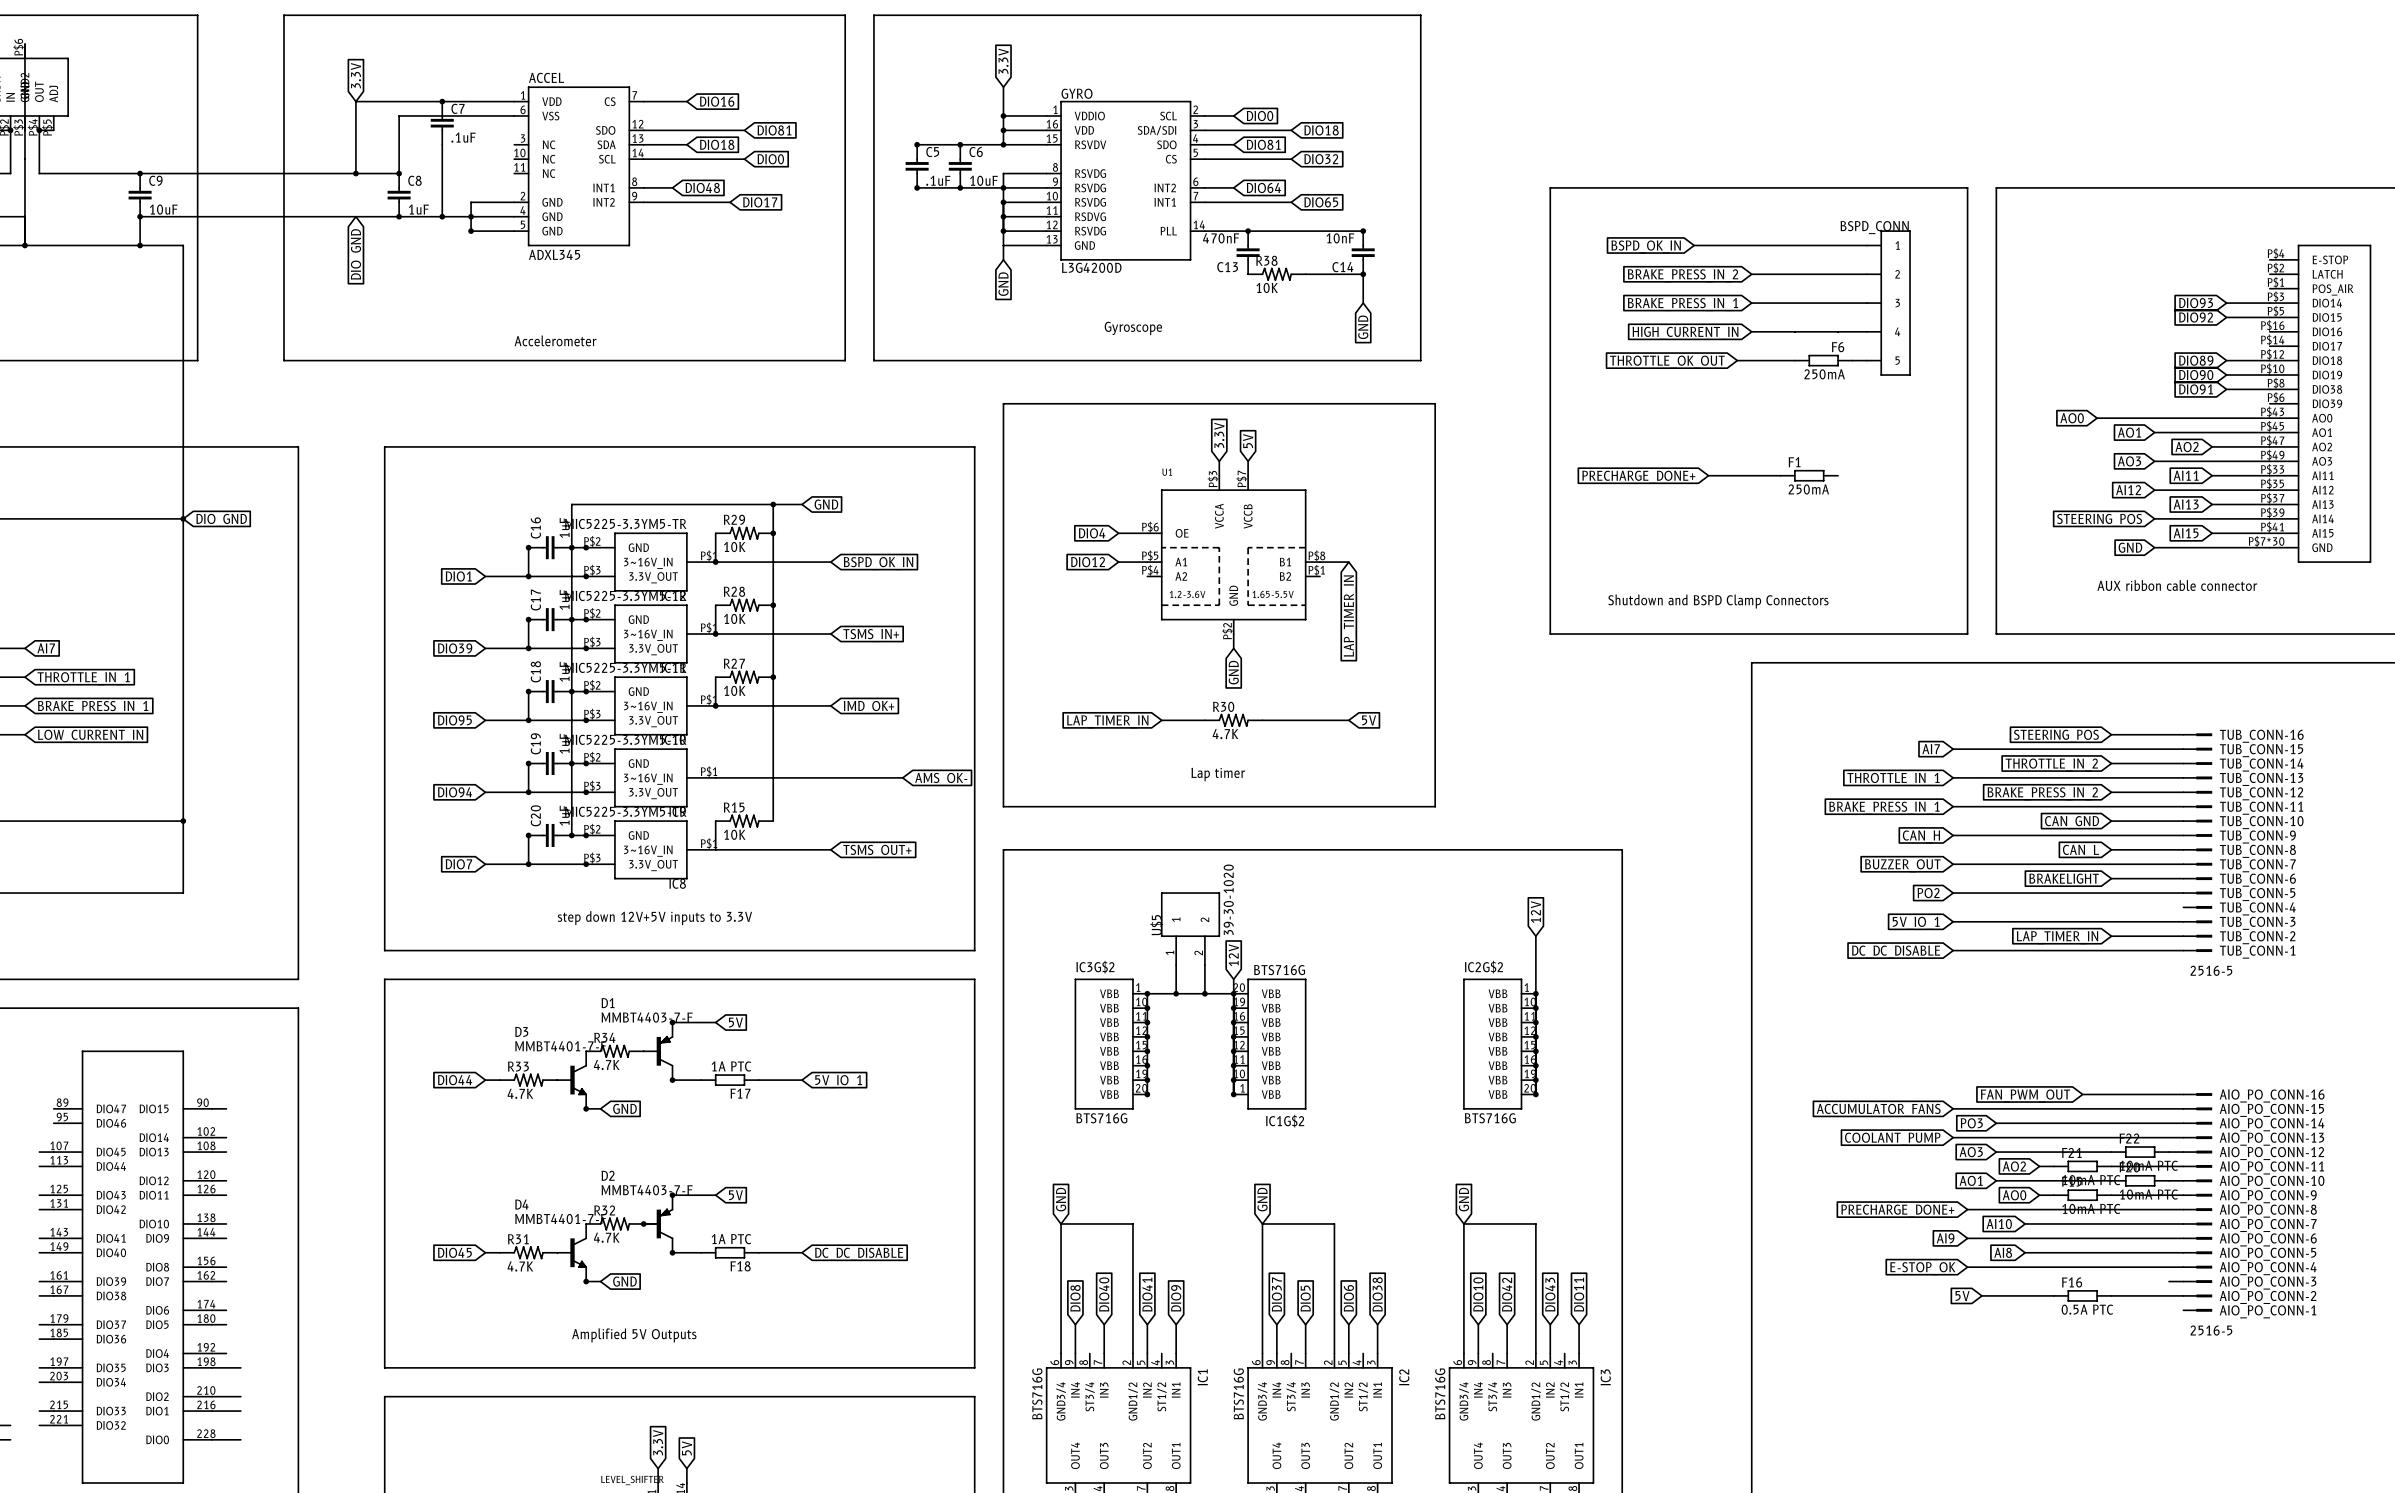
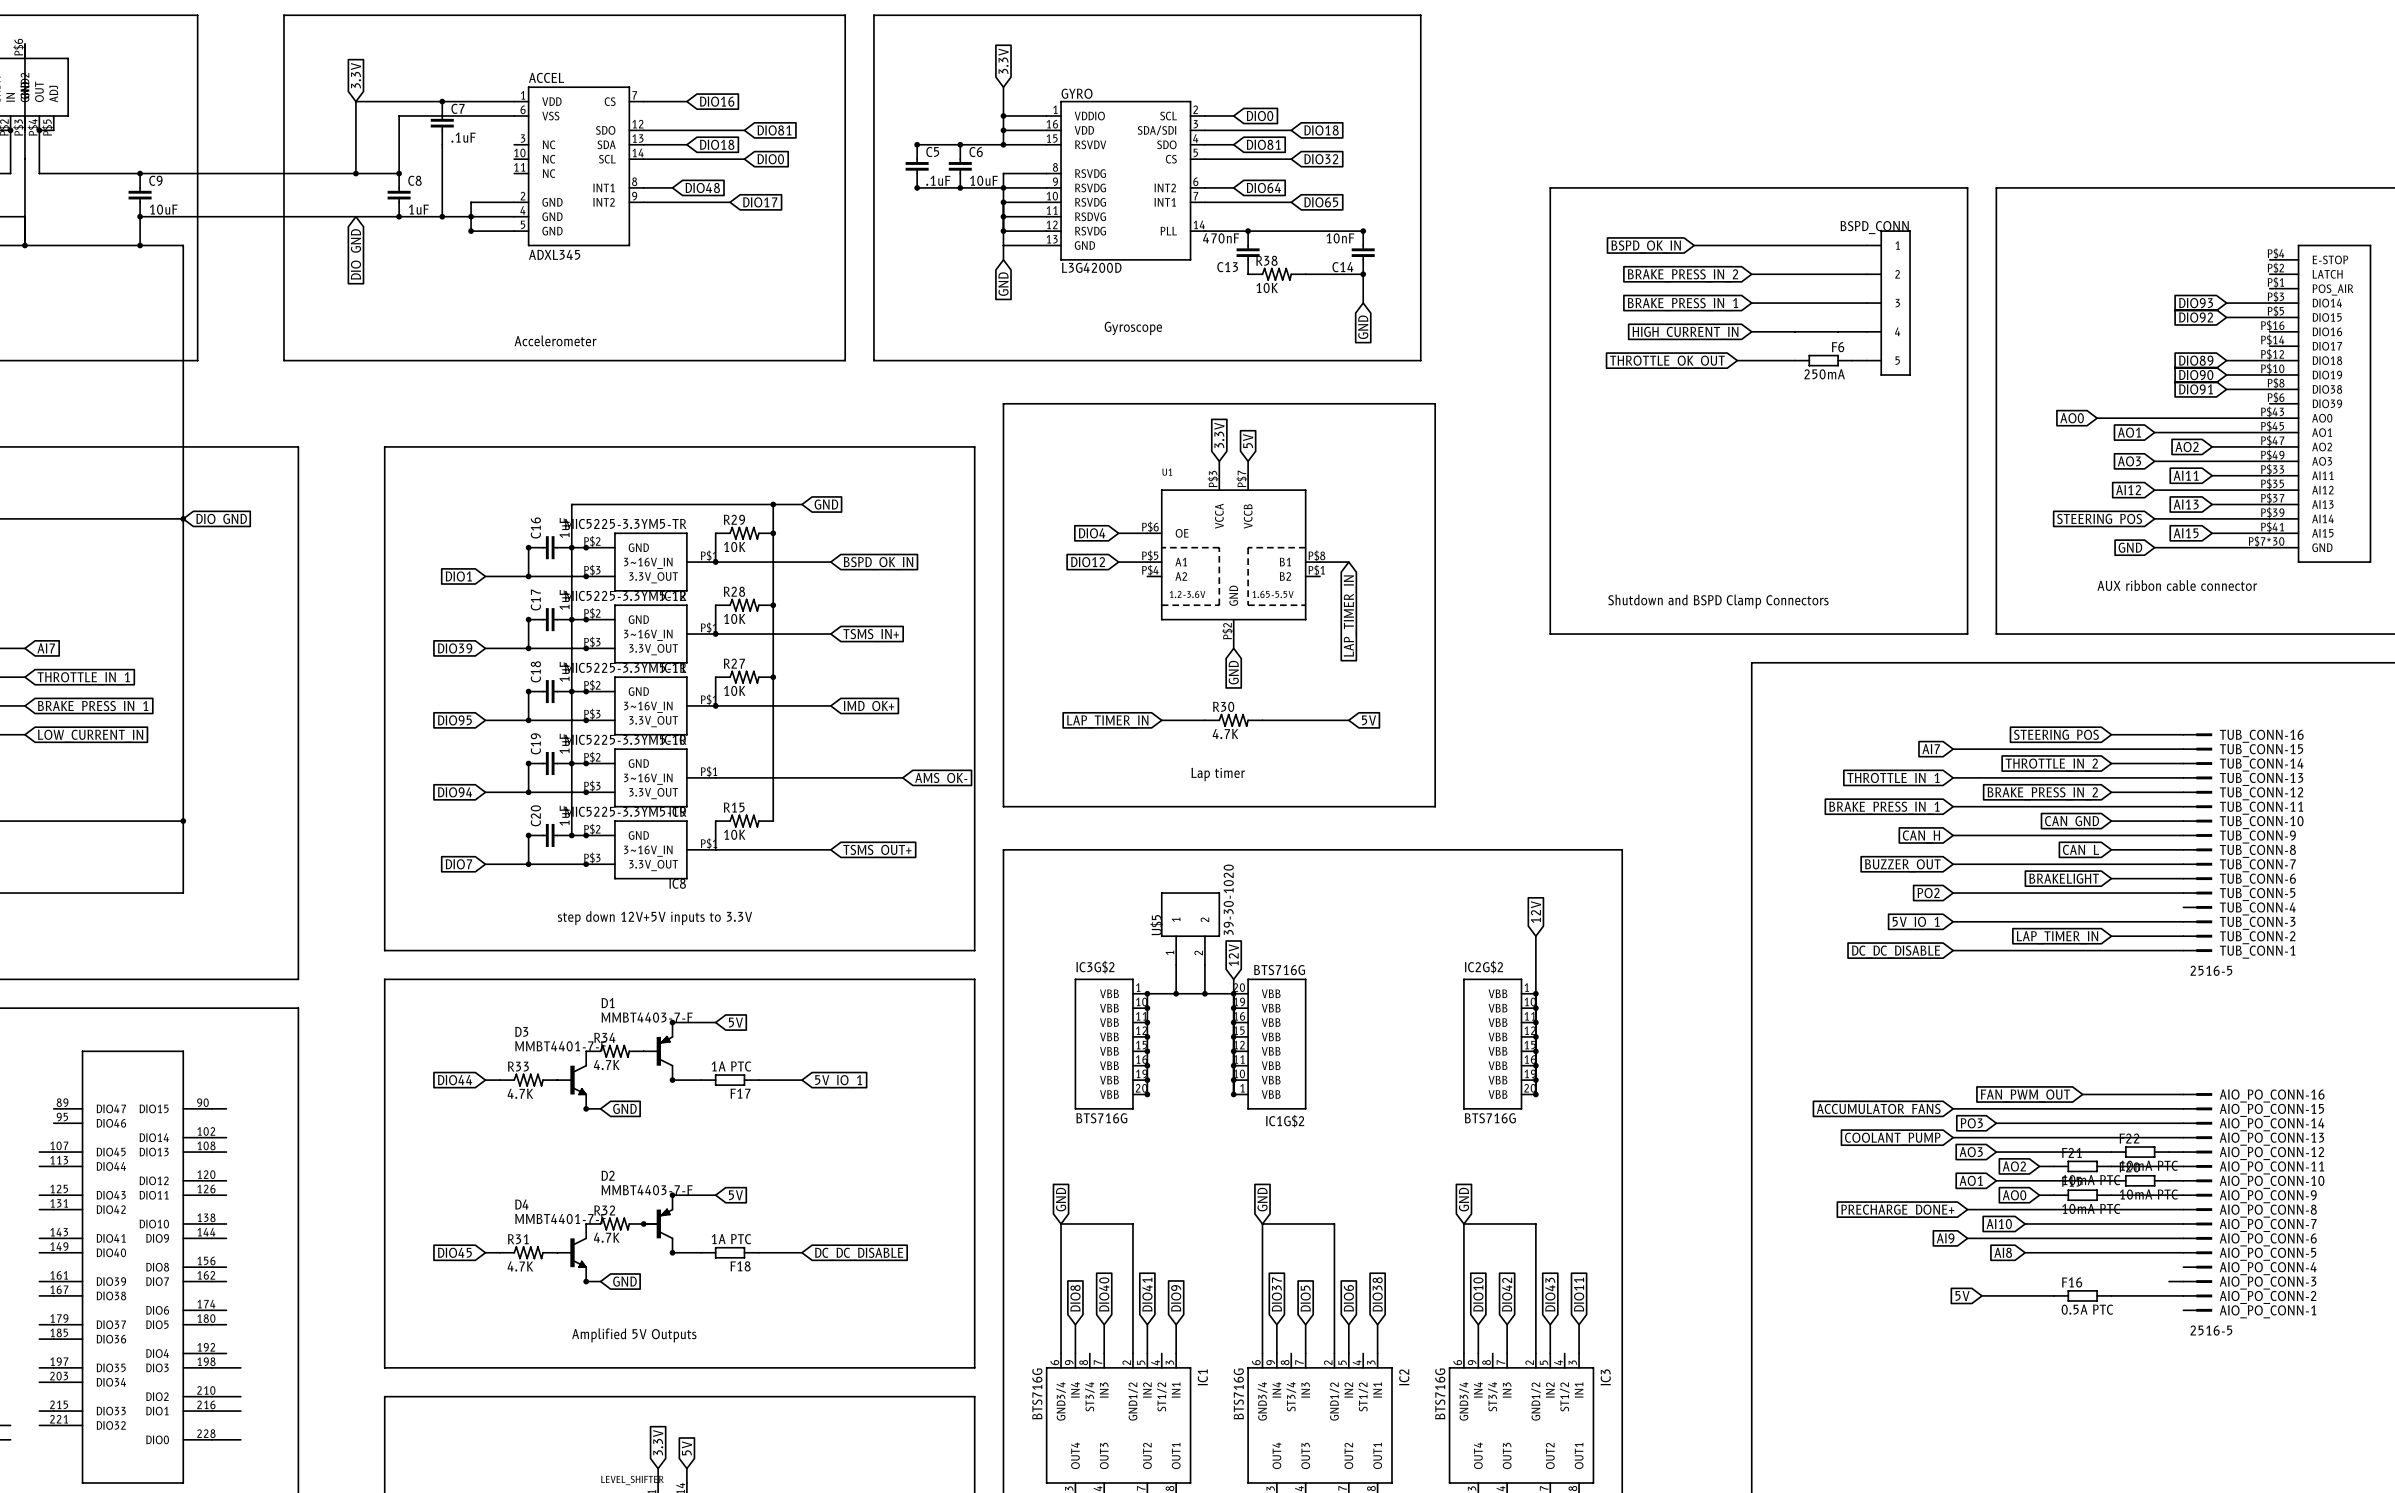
wire: (1708, 475) (1780, 475) -> none
F1: 250mA (1809, 475) -> none
global label: PRECHARGE_DONE+ (1638, 477) -> none
wire: (1967, 1267) (2183, 1267) -> none
global label: E-STOP_OK (1922, 1268) -> none

